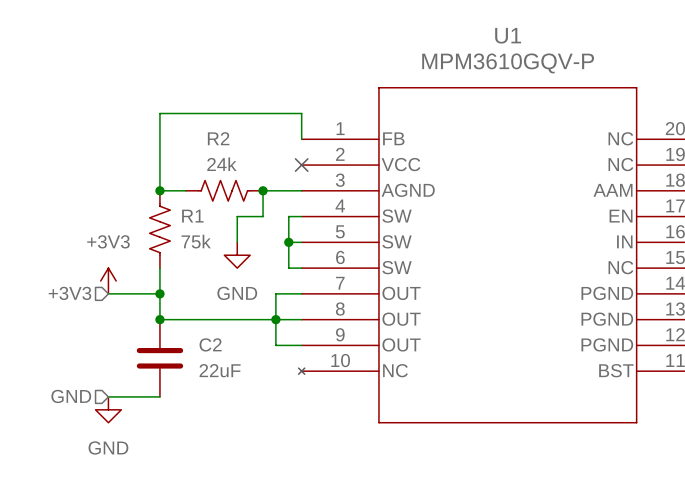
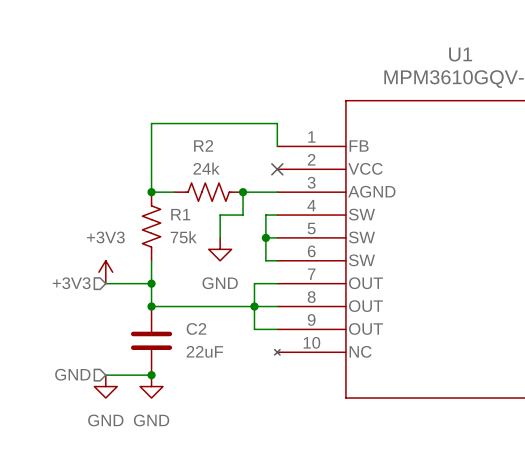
junction: none -> (151, 375)
power symbol: none -> GND (151, 386)

